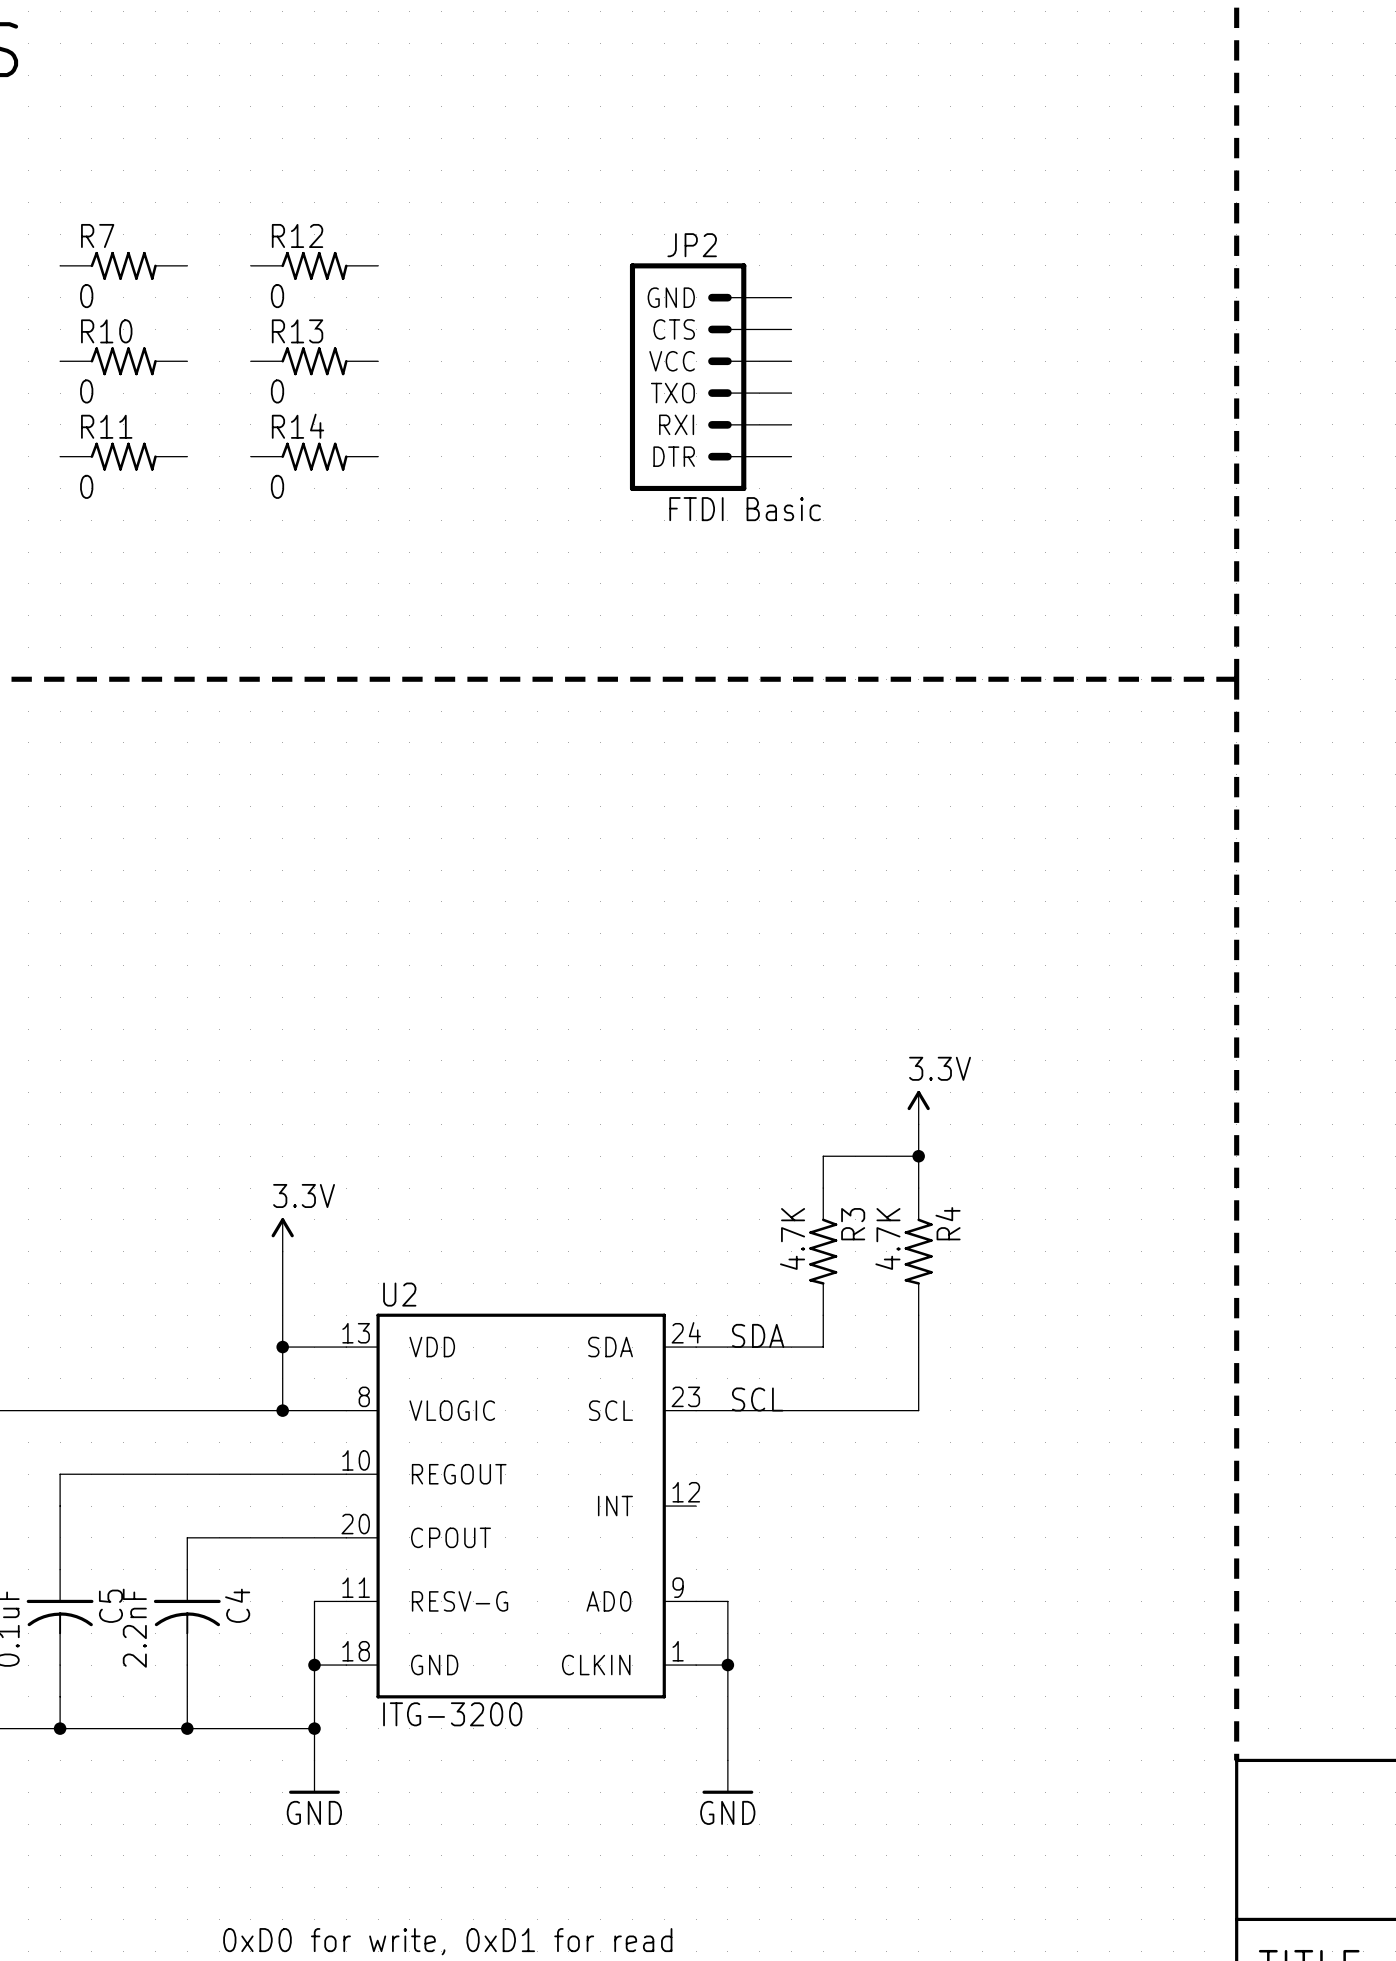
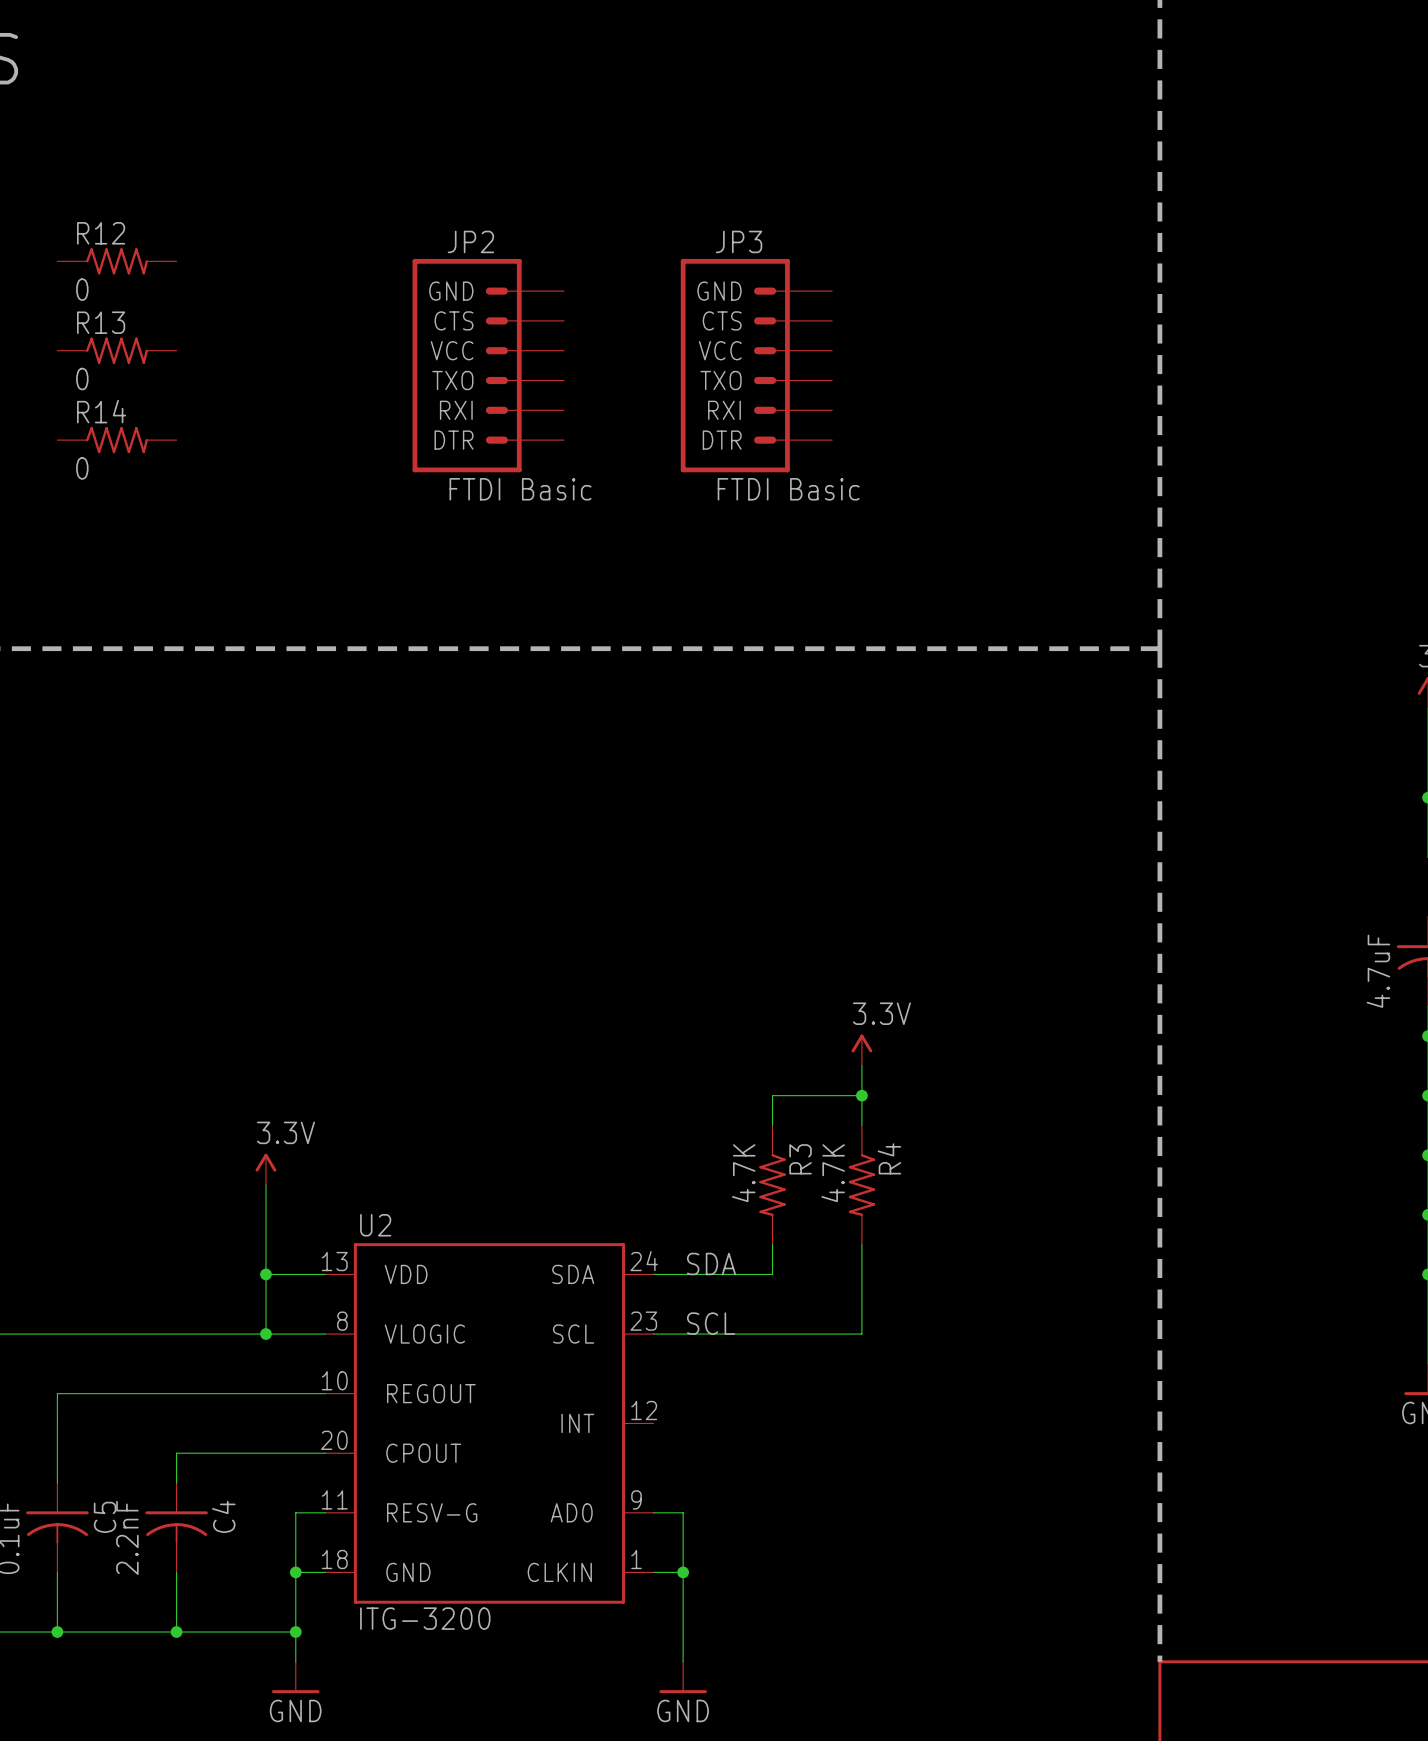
R7 name: R7 (97, 235) -> R12 (101, 233)
R12: 0 (314, 265) -> none
R10 name: R10 (106, 331) -> R13 (101, 322)
R13: 0 (314, 361) -> none
JP2 position: (710, 377) -> (488, 365)
JP3: none -> FTDI Basic (756, 365)
R11 name: R11 (106, 426) -> R14 (101, 411)
R14: 0 (314, 456) -> none

